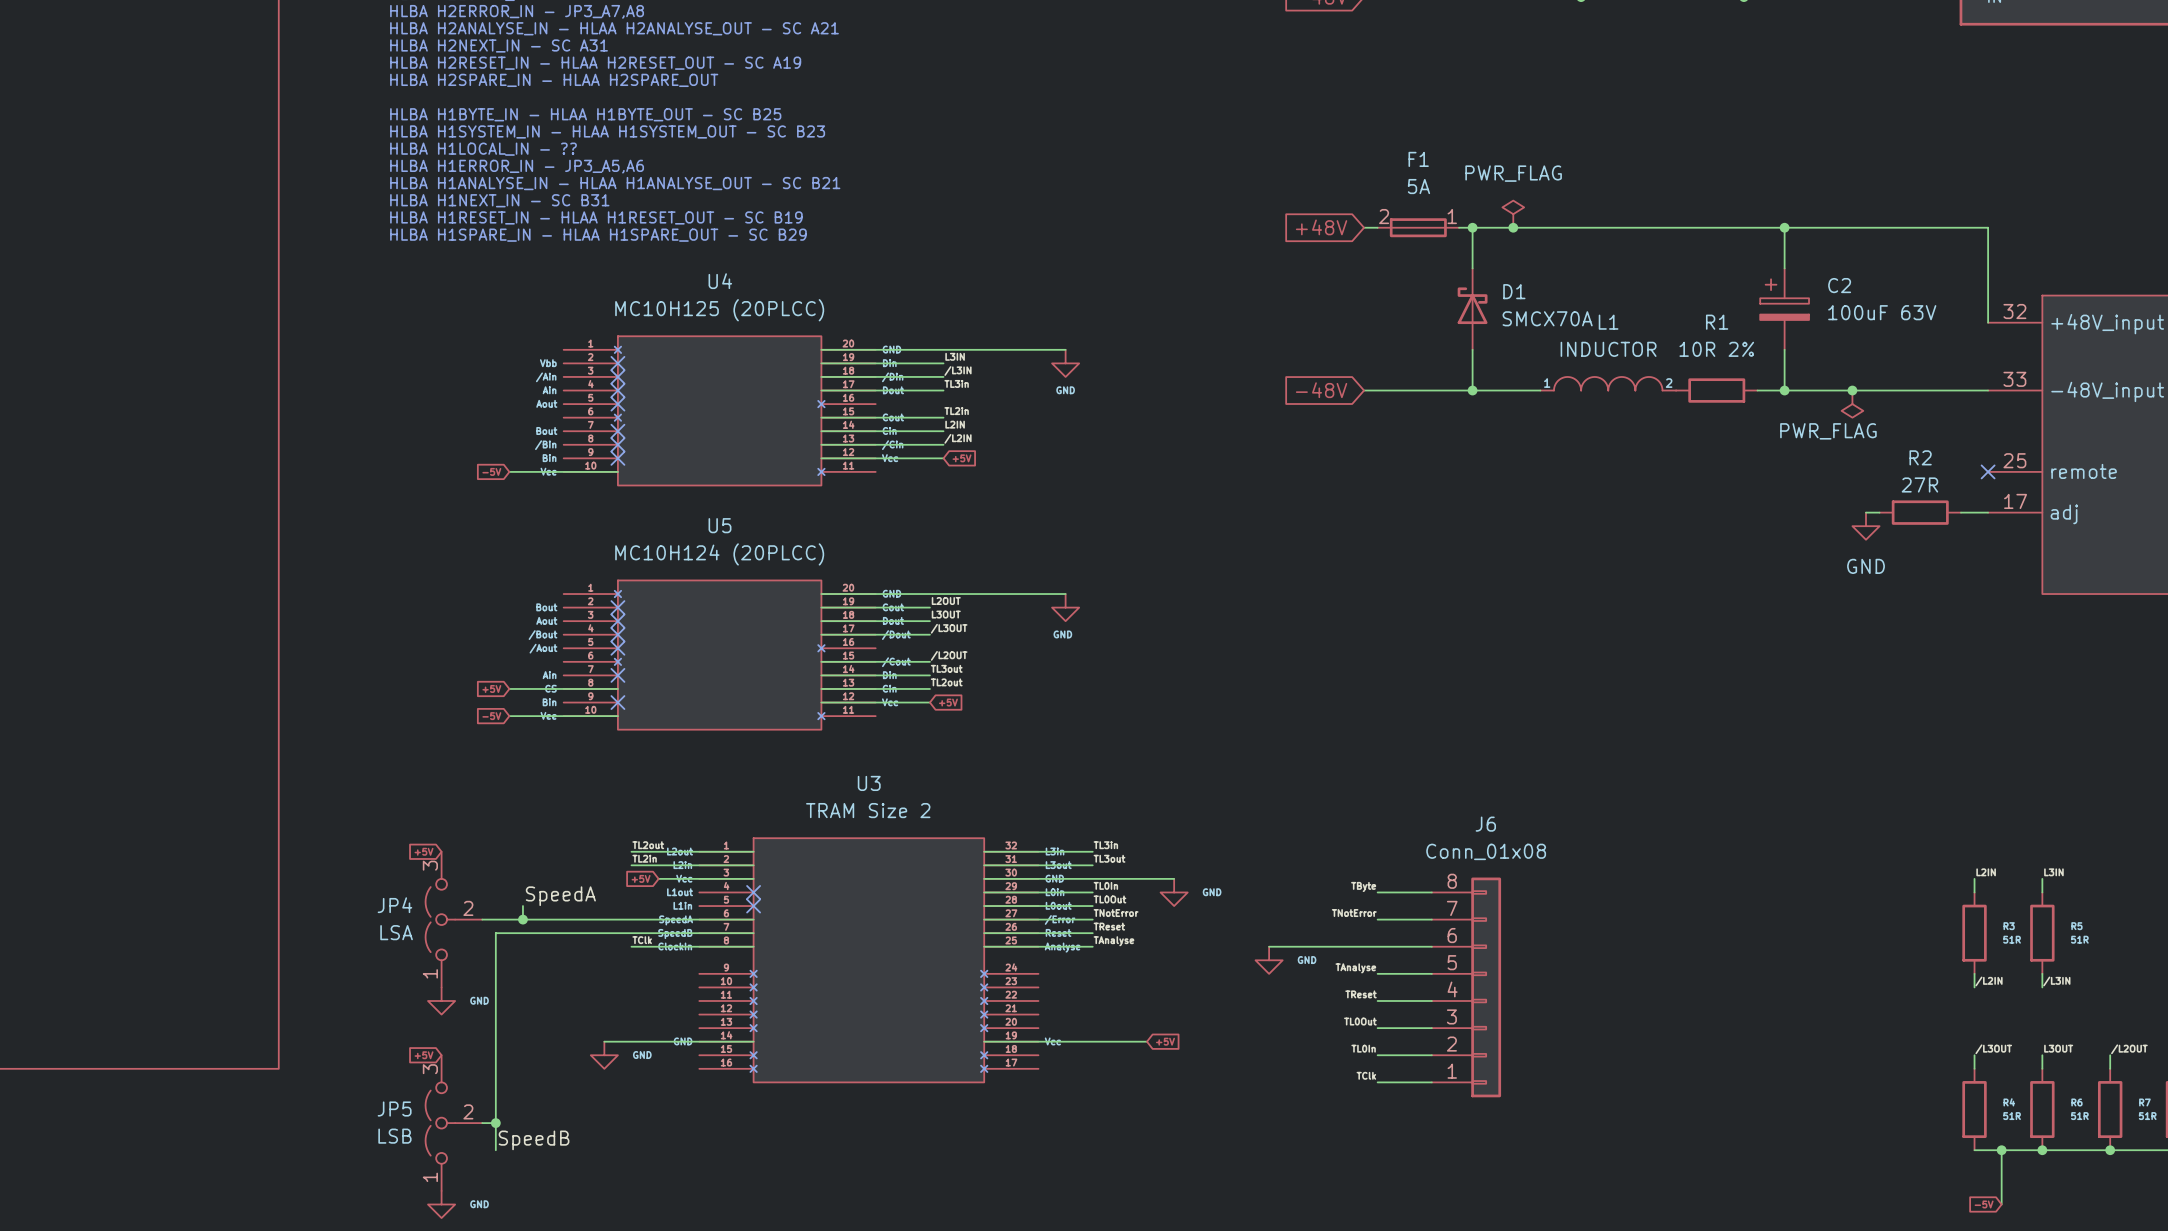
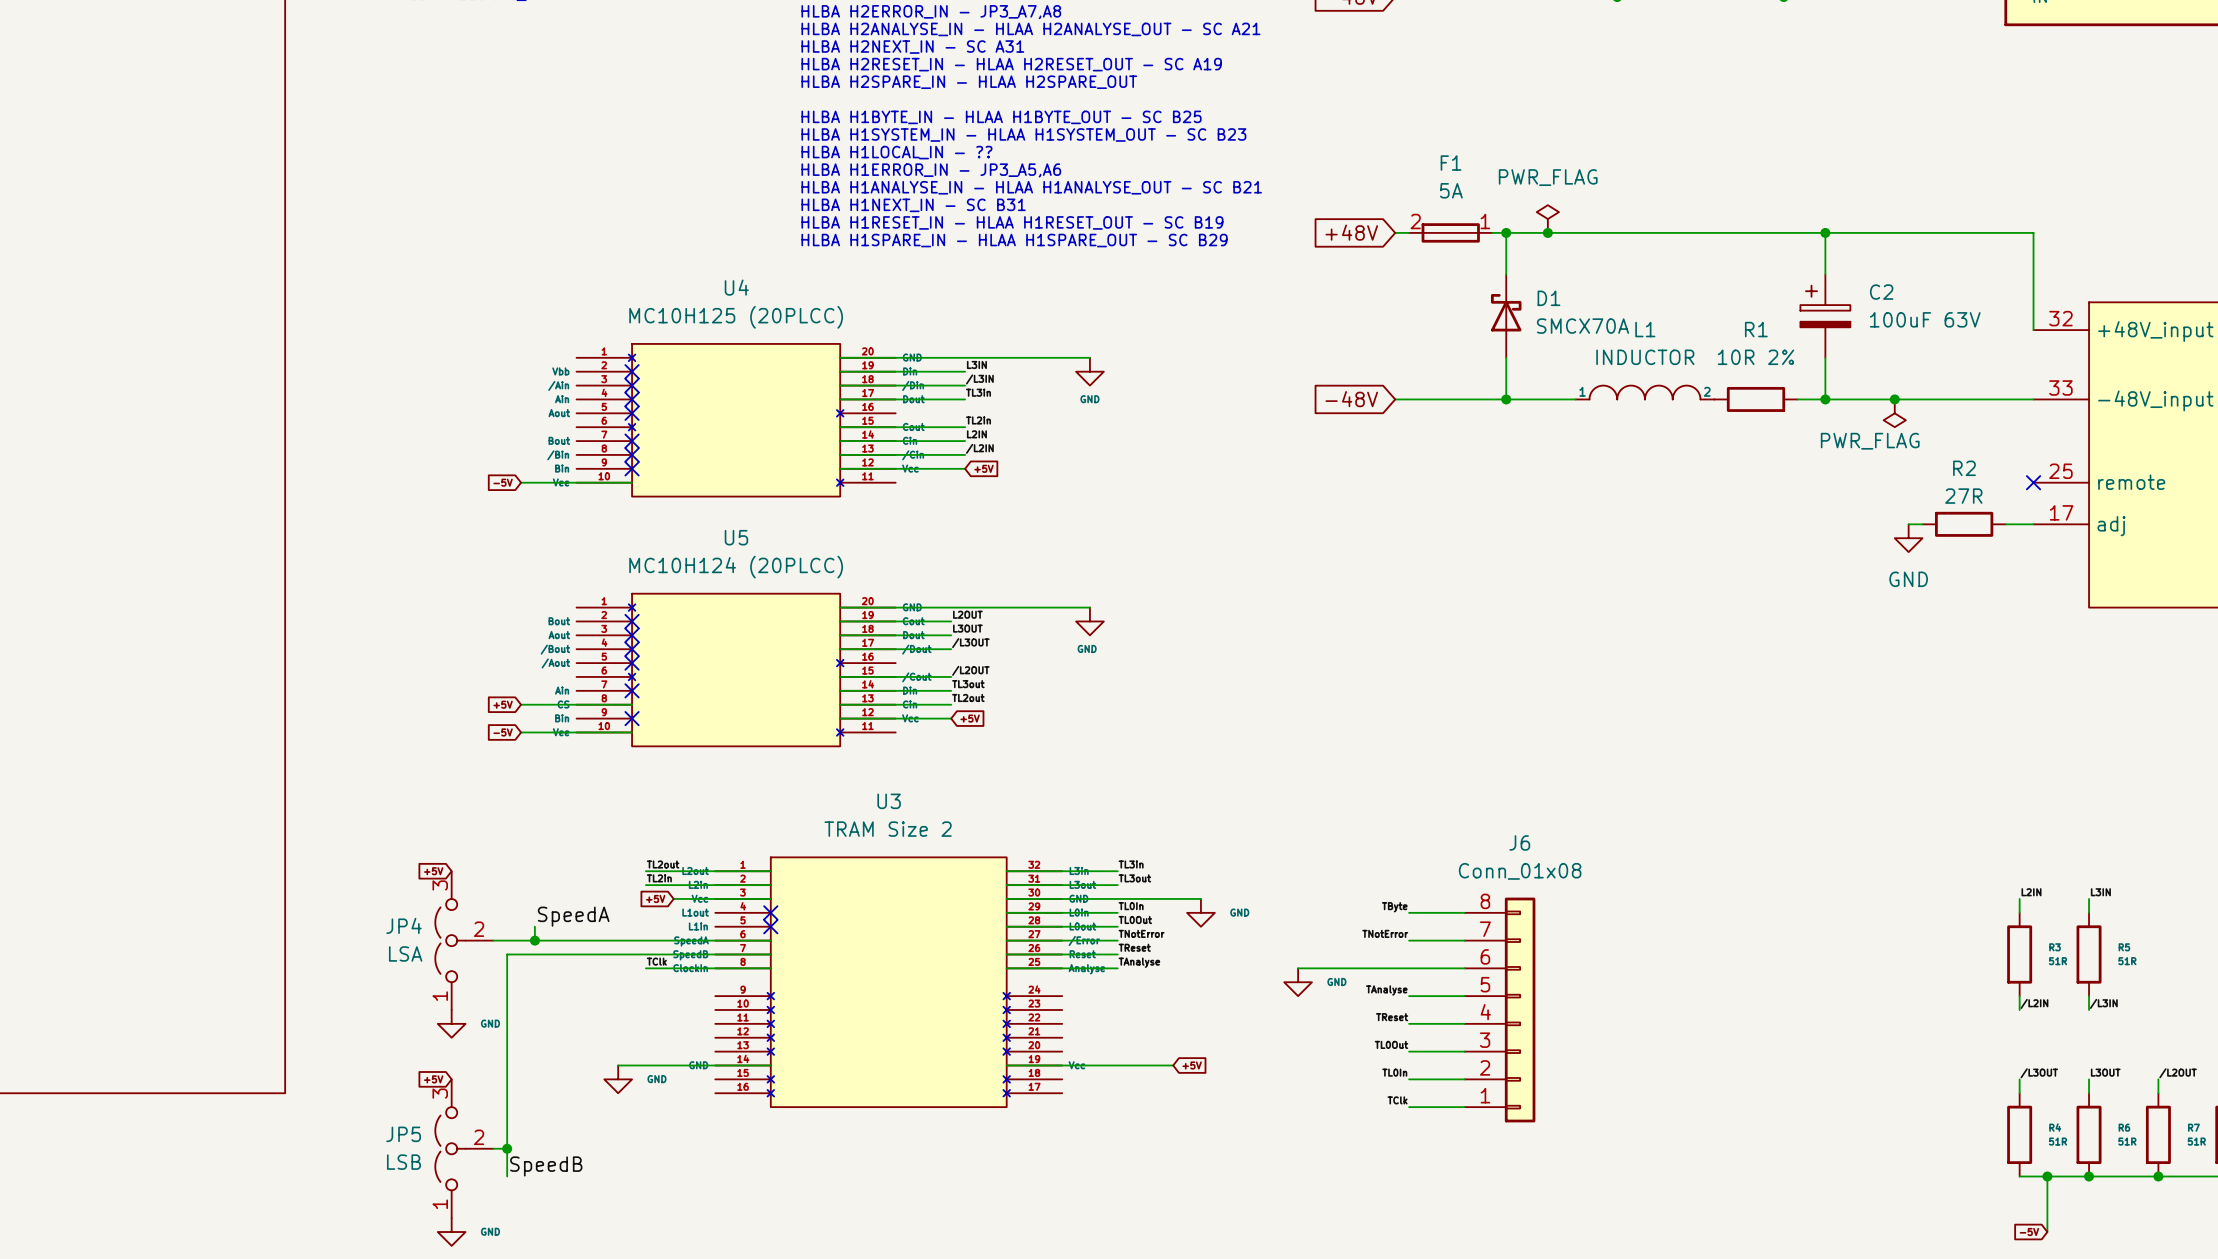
text: HLBA H2ERROR_IN - JP3_A7,A8 (517, 11) -> none
text: none -> HLBA H2ERROR_IN - JP3_A7,A8 (931, 12)
text: HLBA H2ANALYSE_IN - HLAA H2ANALYSE_OUT - SC A21 (614, 28) -> none
text: none -> HLBA H2ANALYSE_IN - HLAA H2ANALYSE_OUT - SC A21 (1030, 29)
text: HLBA H2NEXT_IN - SC A31 (499, 45) -> none
text: none -> HLBA H2NEXT_IN - SC A31 (912, 47)
text: HLBA H2RESET_IN - HLAA H2RESET_OUT - SC A19 (595, 63) -> none
text: none -> HLBA H2RESET_IN - HLAA H2RESET_OUT - SC A19 (1011, 64)
text: HLBA H2SPARE_IN - HLAA H2SPARE_OUT (554, 80) -> none
text: none -> HLBA H2SPARE_IN - HLAA H2SPARE_OUT (969, 82)
text: HLBA H1BYTE_IN - HLAA H1BYTE_OUT - SC B25 (585, 114) -> none
text: none -> HLBA H1BYTE_IN - HLAA H1BYTE_OUT - SC B25 (1001, 117)
text: HLBA H1SYSTEM_IN - HLAA H1SYSTEM_OUT - SC B23 (607, 131) -> none
text: none -> HLBA H1SYSTEM_IN - HLAA H1SYSTEM_OUT - SC B23 (1023, 134)
text: HLBA H1LOCAL_IN - ?? (483, 149) -> none
text: none -> HLBA H1LOCAL_IN - ?? (896, 152)
text: HLBA H1ERROR_IN - JP3_A5,A6 (517, 166) -> none
text: none -> HLBA H1ERROR_IN - JP3_A5,A6 (931, 170)
text: HLBA H1ANALYSE_IN - HLAA H1ANALYSE_OUT - SC B21 (615, 183) -> none
text: none -> HLBA H1ANALYSE_IN - HLAA H1ANALYSE_OUT - SC B21 (1031, 187)
text: HLBA H1NEXT_IN - SC B31 (499, 200) -> none
text: none -> HLBA H1NEXT_IN - SC B31 (913, 205)
text: HLBA H1RESET_IN - HLAA H1RESET_OUT - SC B19 (596, 217) -> none
text: none -> HLBA H1RESET_IN - HLAA H1RESET_OUT - SC B19 (1012, 222)
text: HLBA H1SPARE_IN - HLAA H1SPARE_OUT - SC B29 (598, 235) -> none
text: none -> HLBA H1SPARE_IN - HLAA H1SPARE_OUT - SC B29 (1014, 240)

